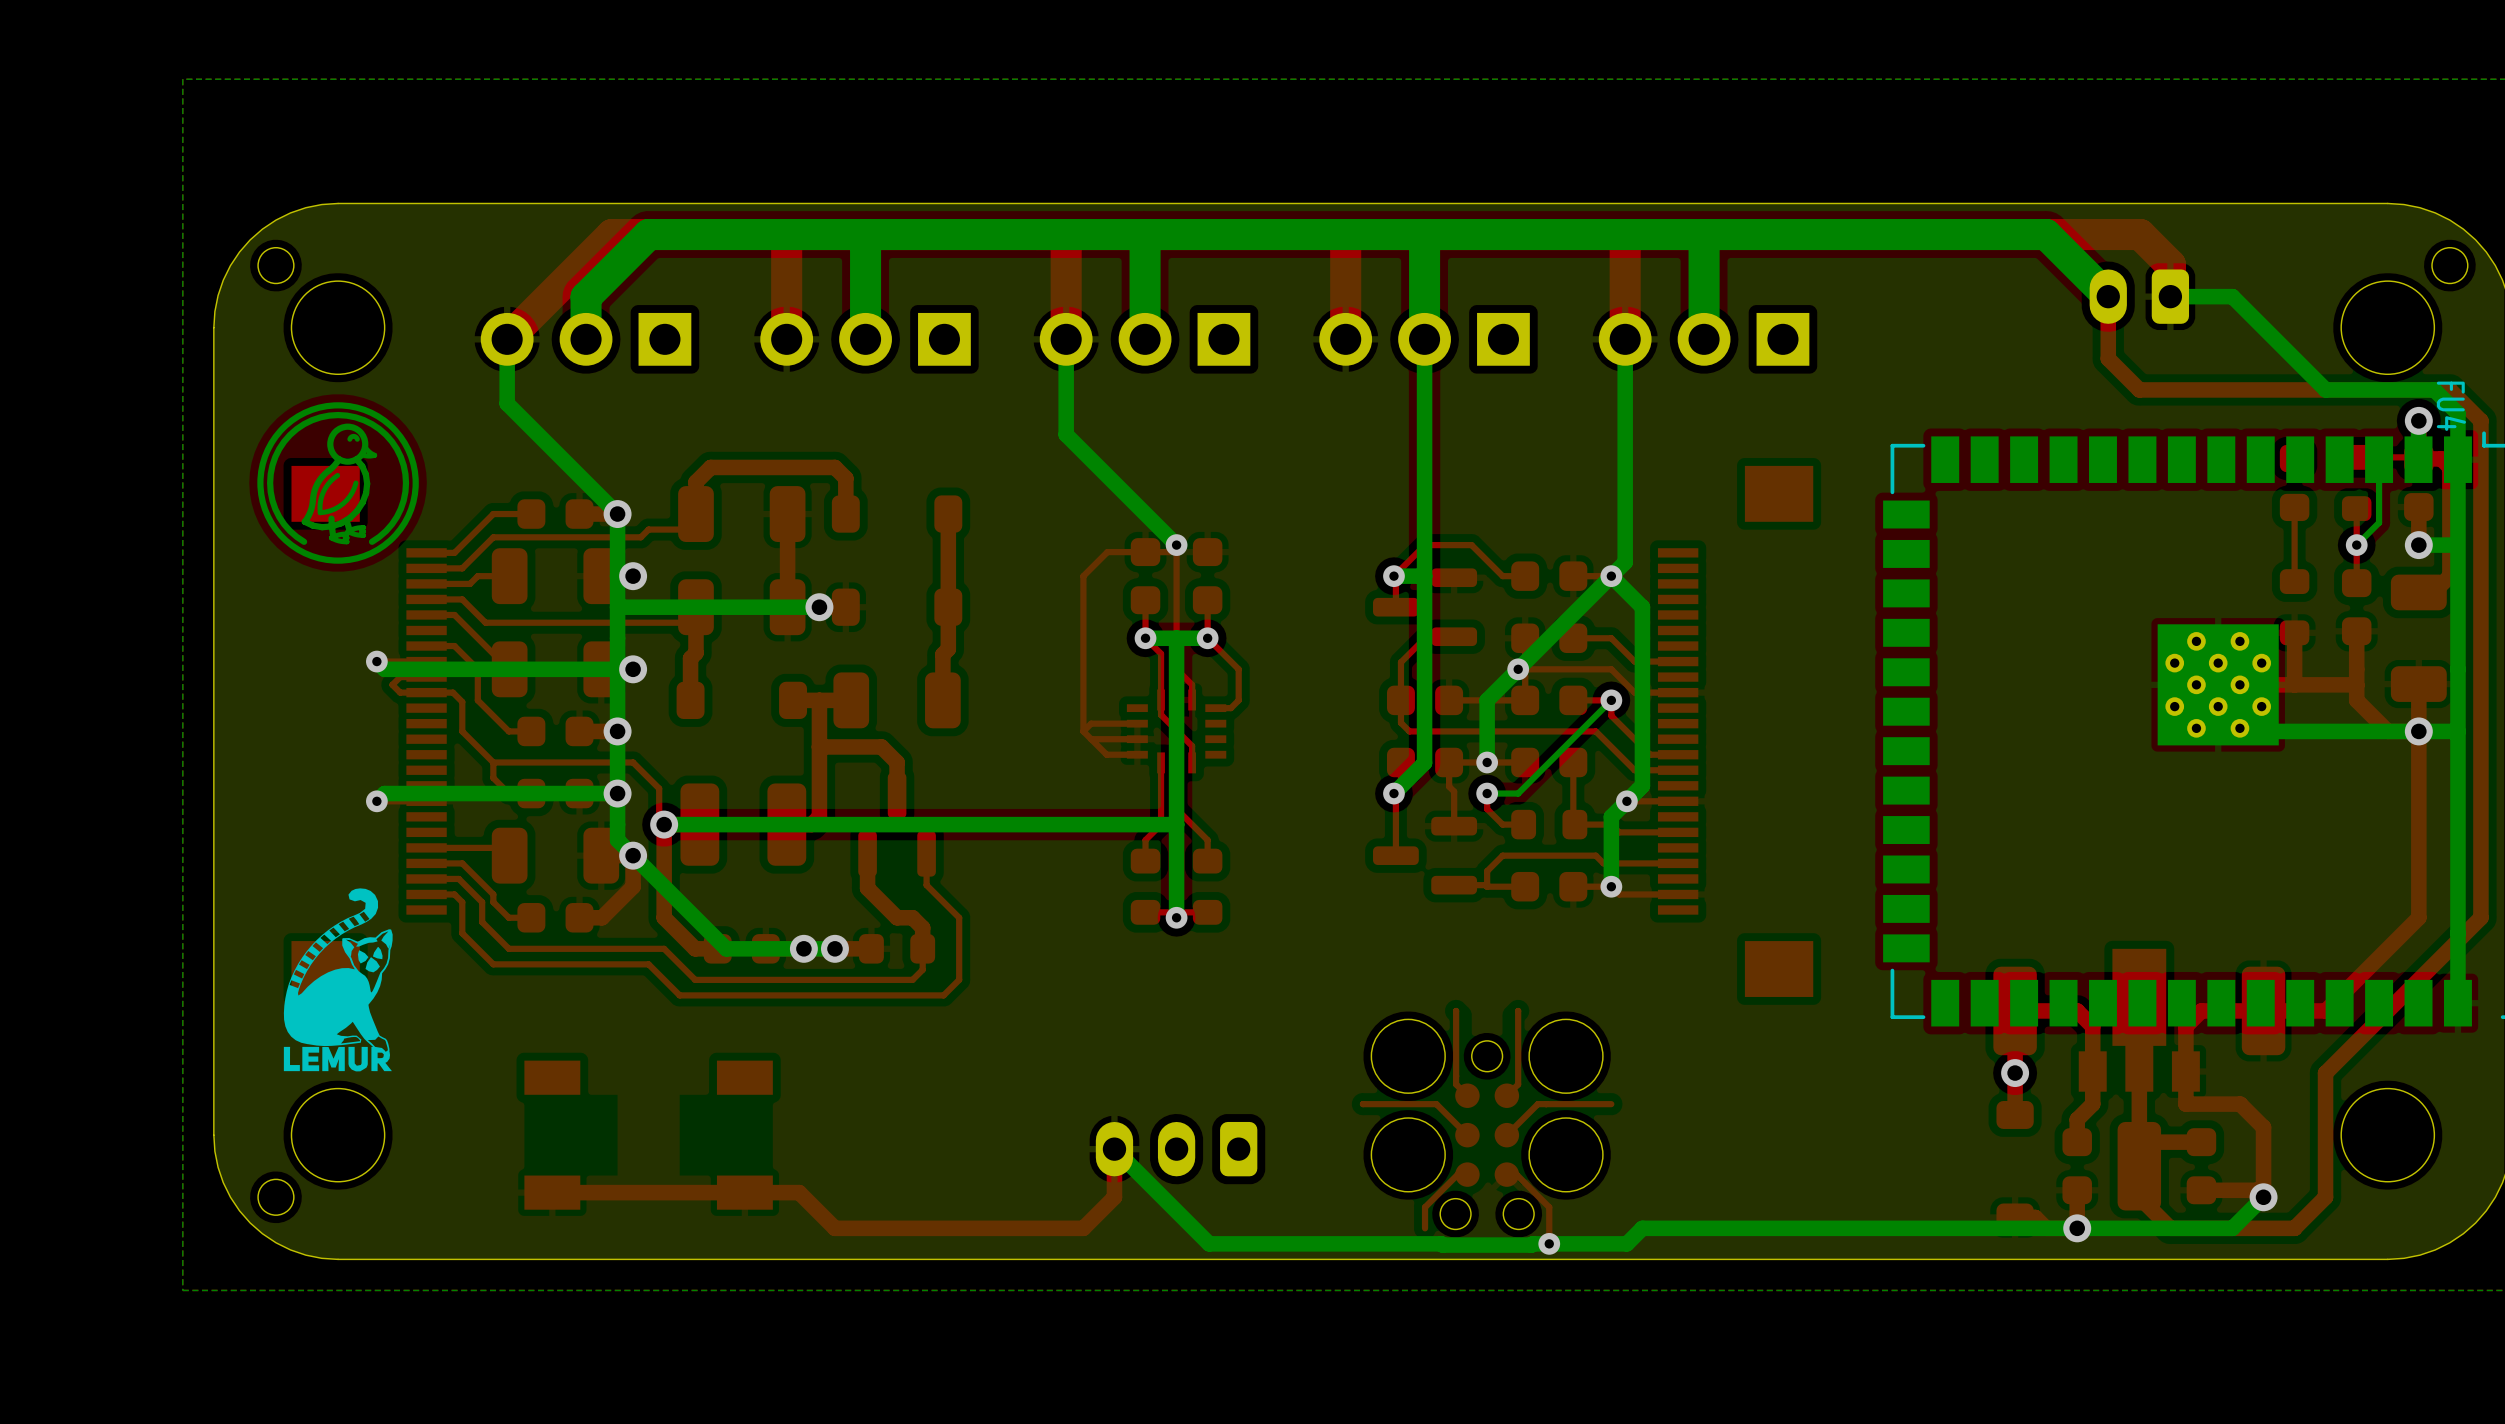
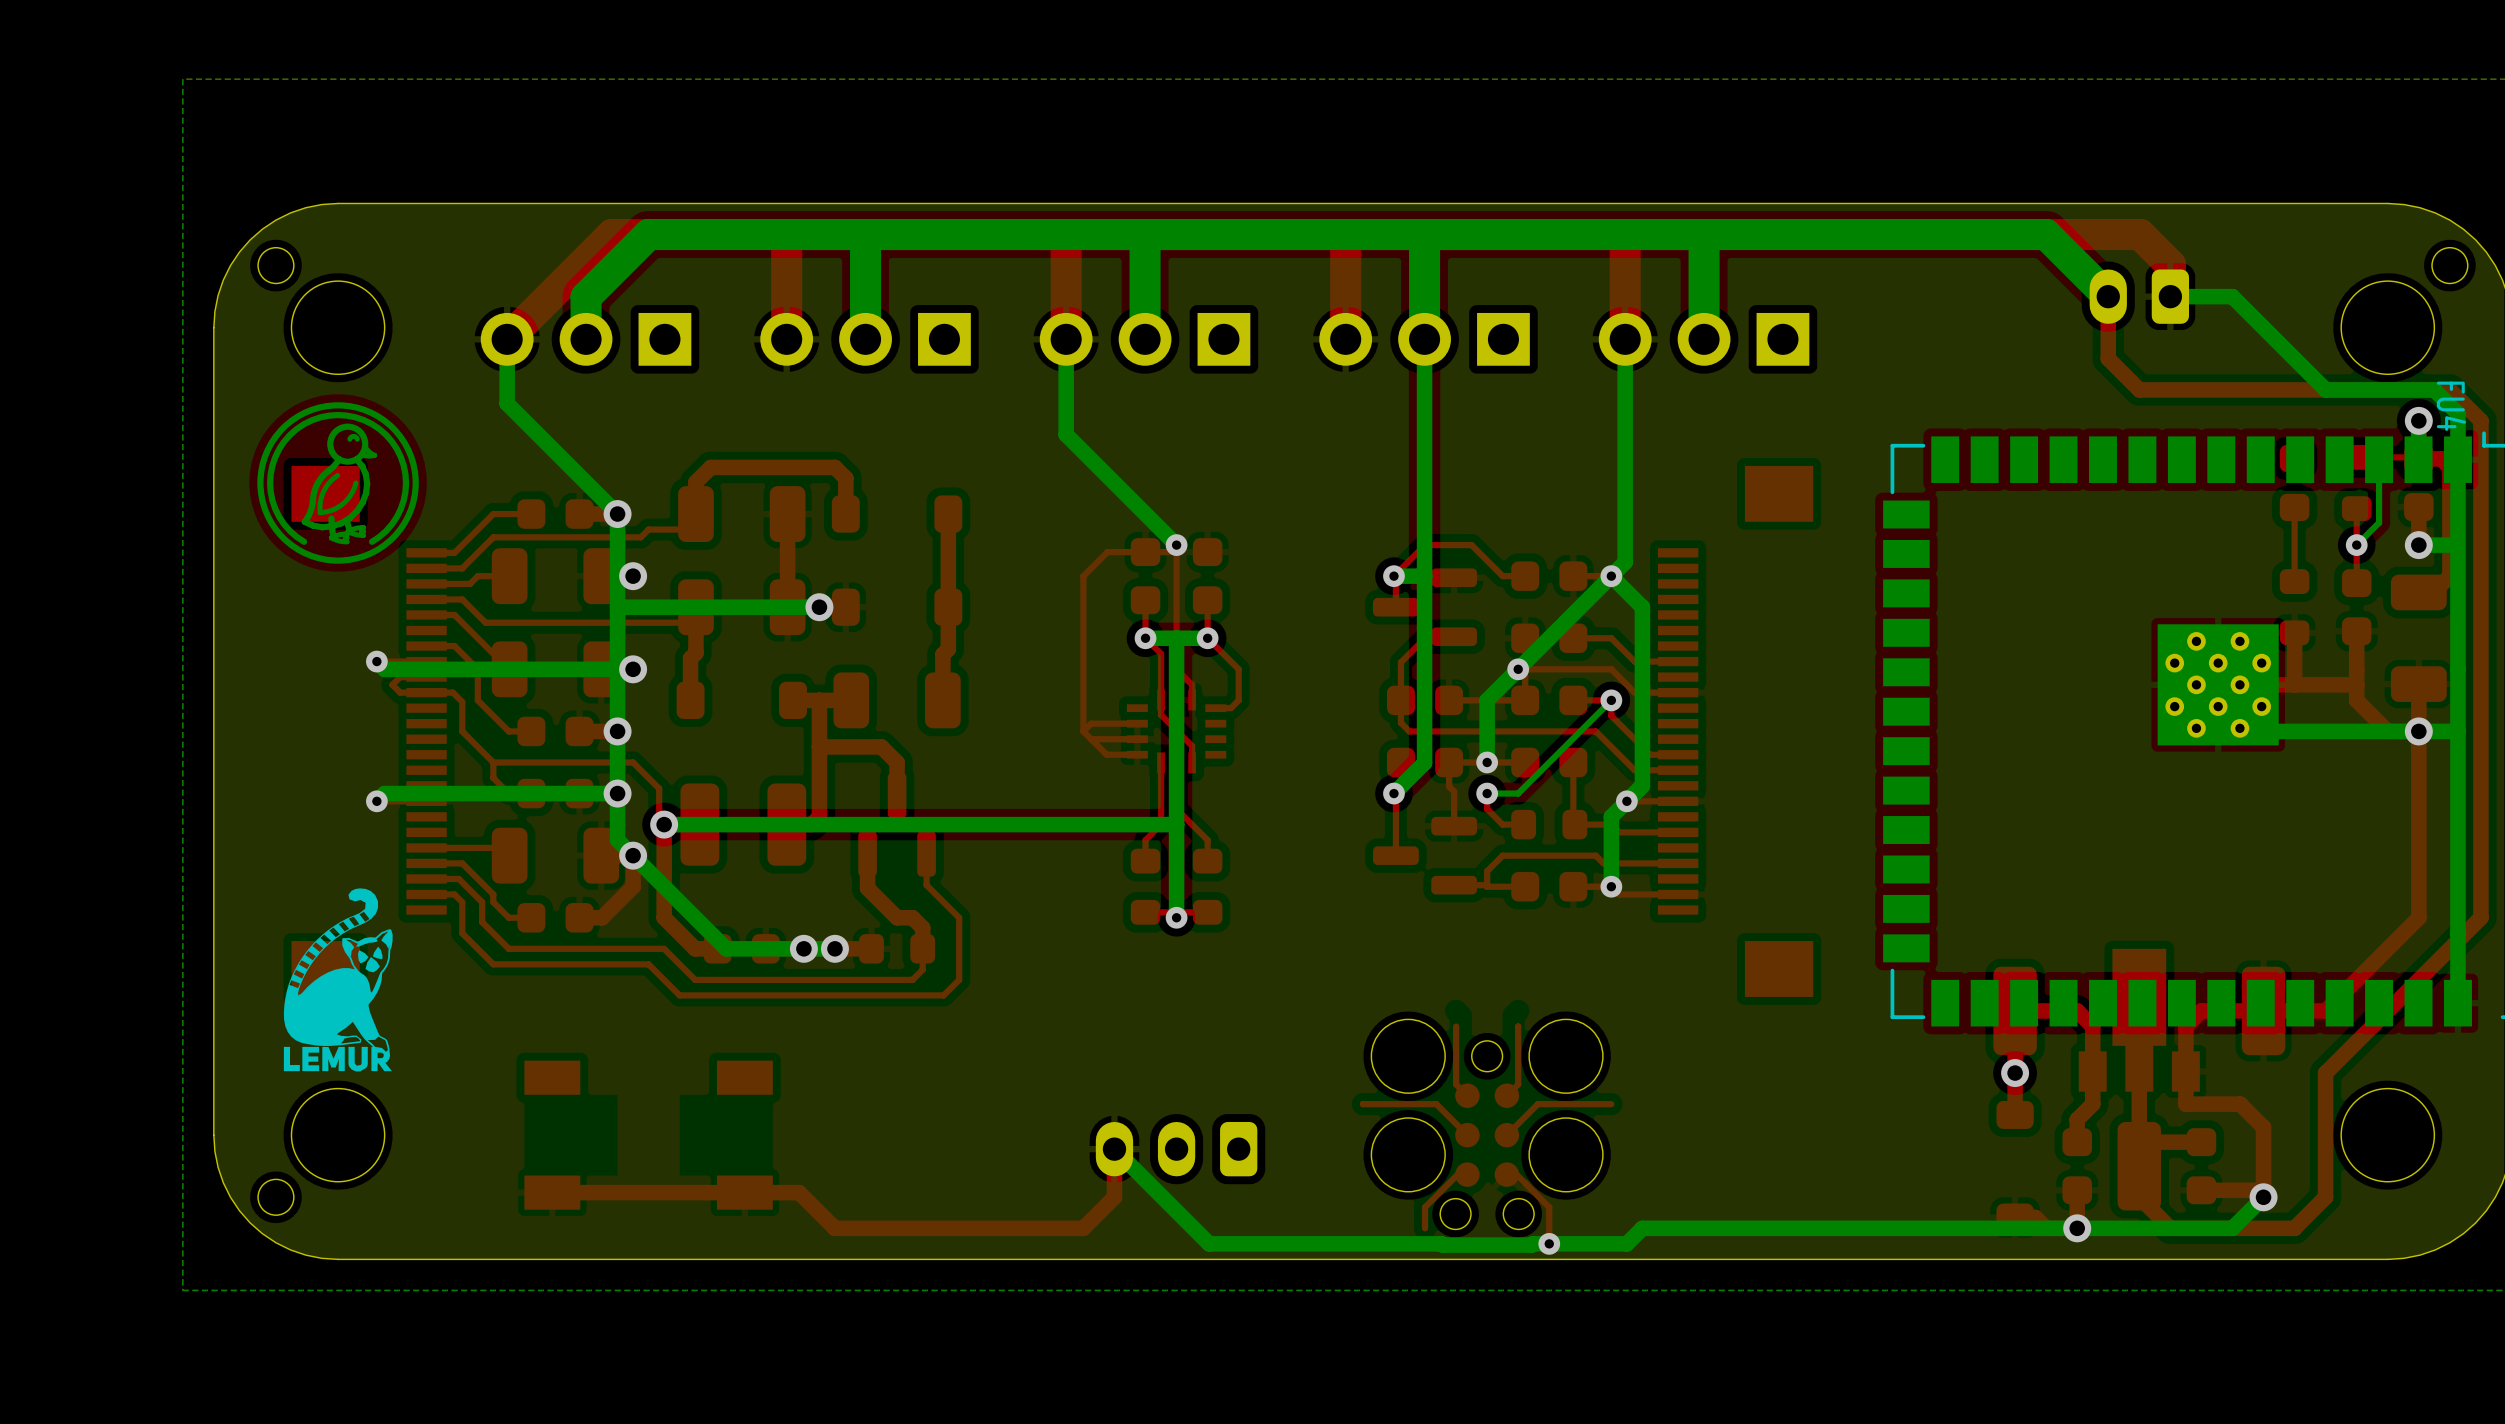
top track: (1456, 1010) (1456, 1026) -> none
top track: (1518, 1010) (1518, 1026) -> none

